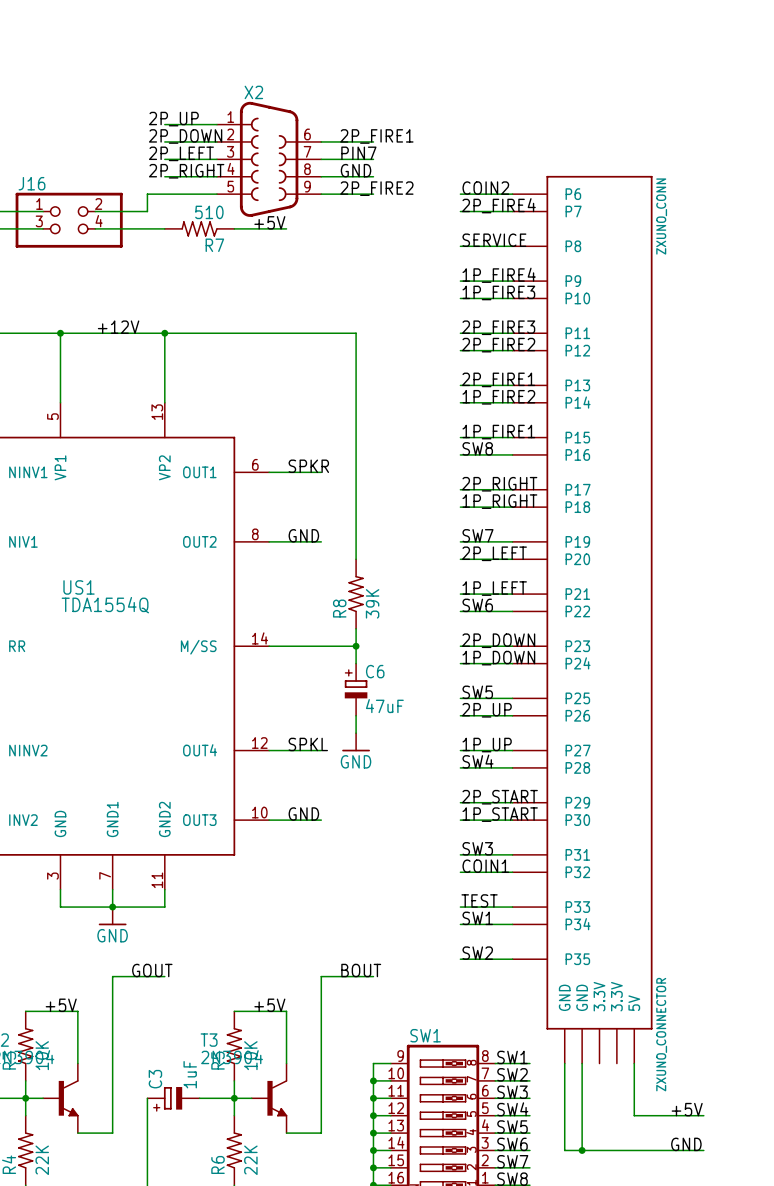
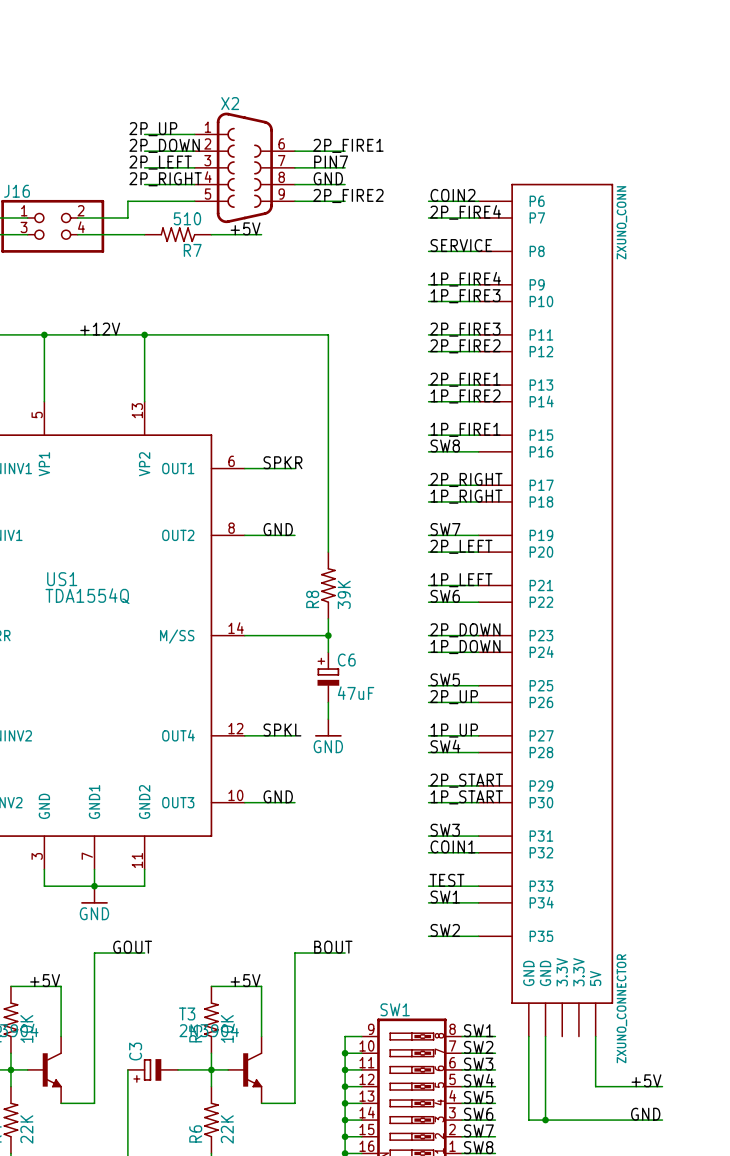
C3 value: 1uF (190, 1074) -> none

